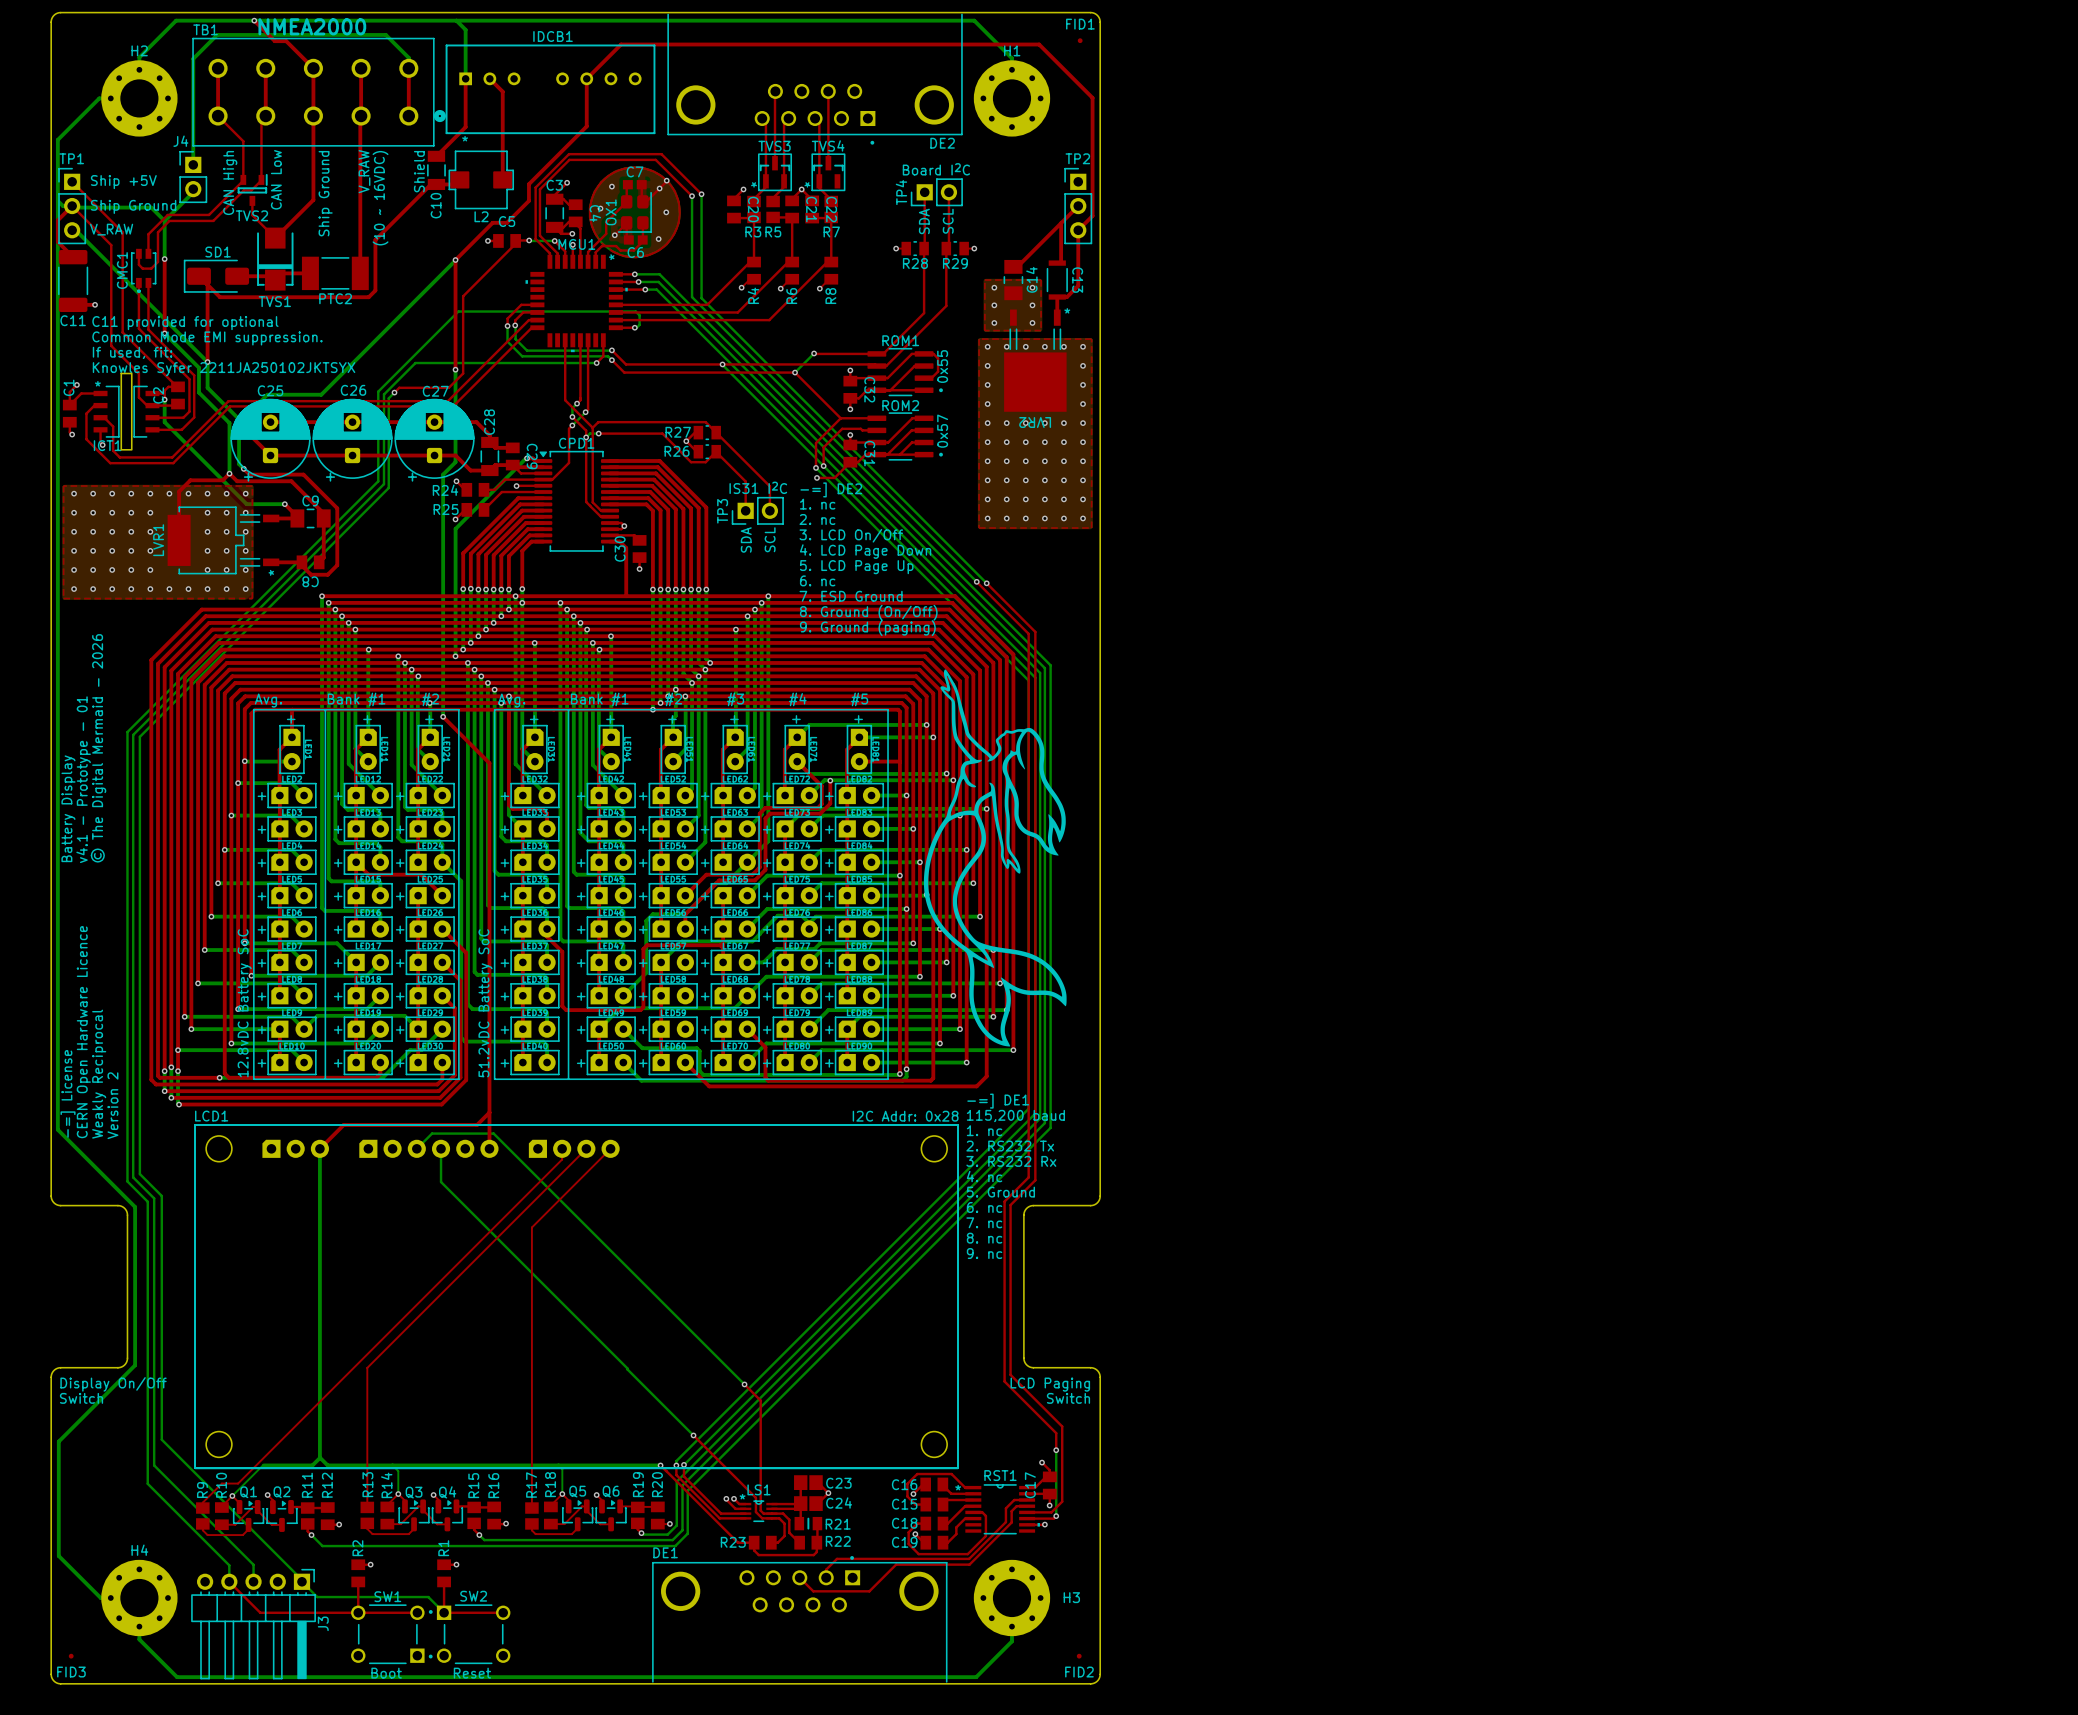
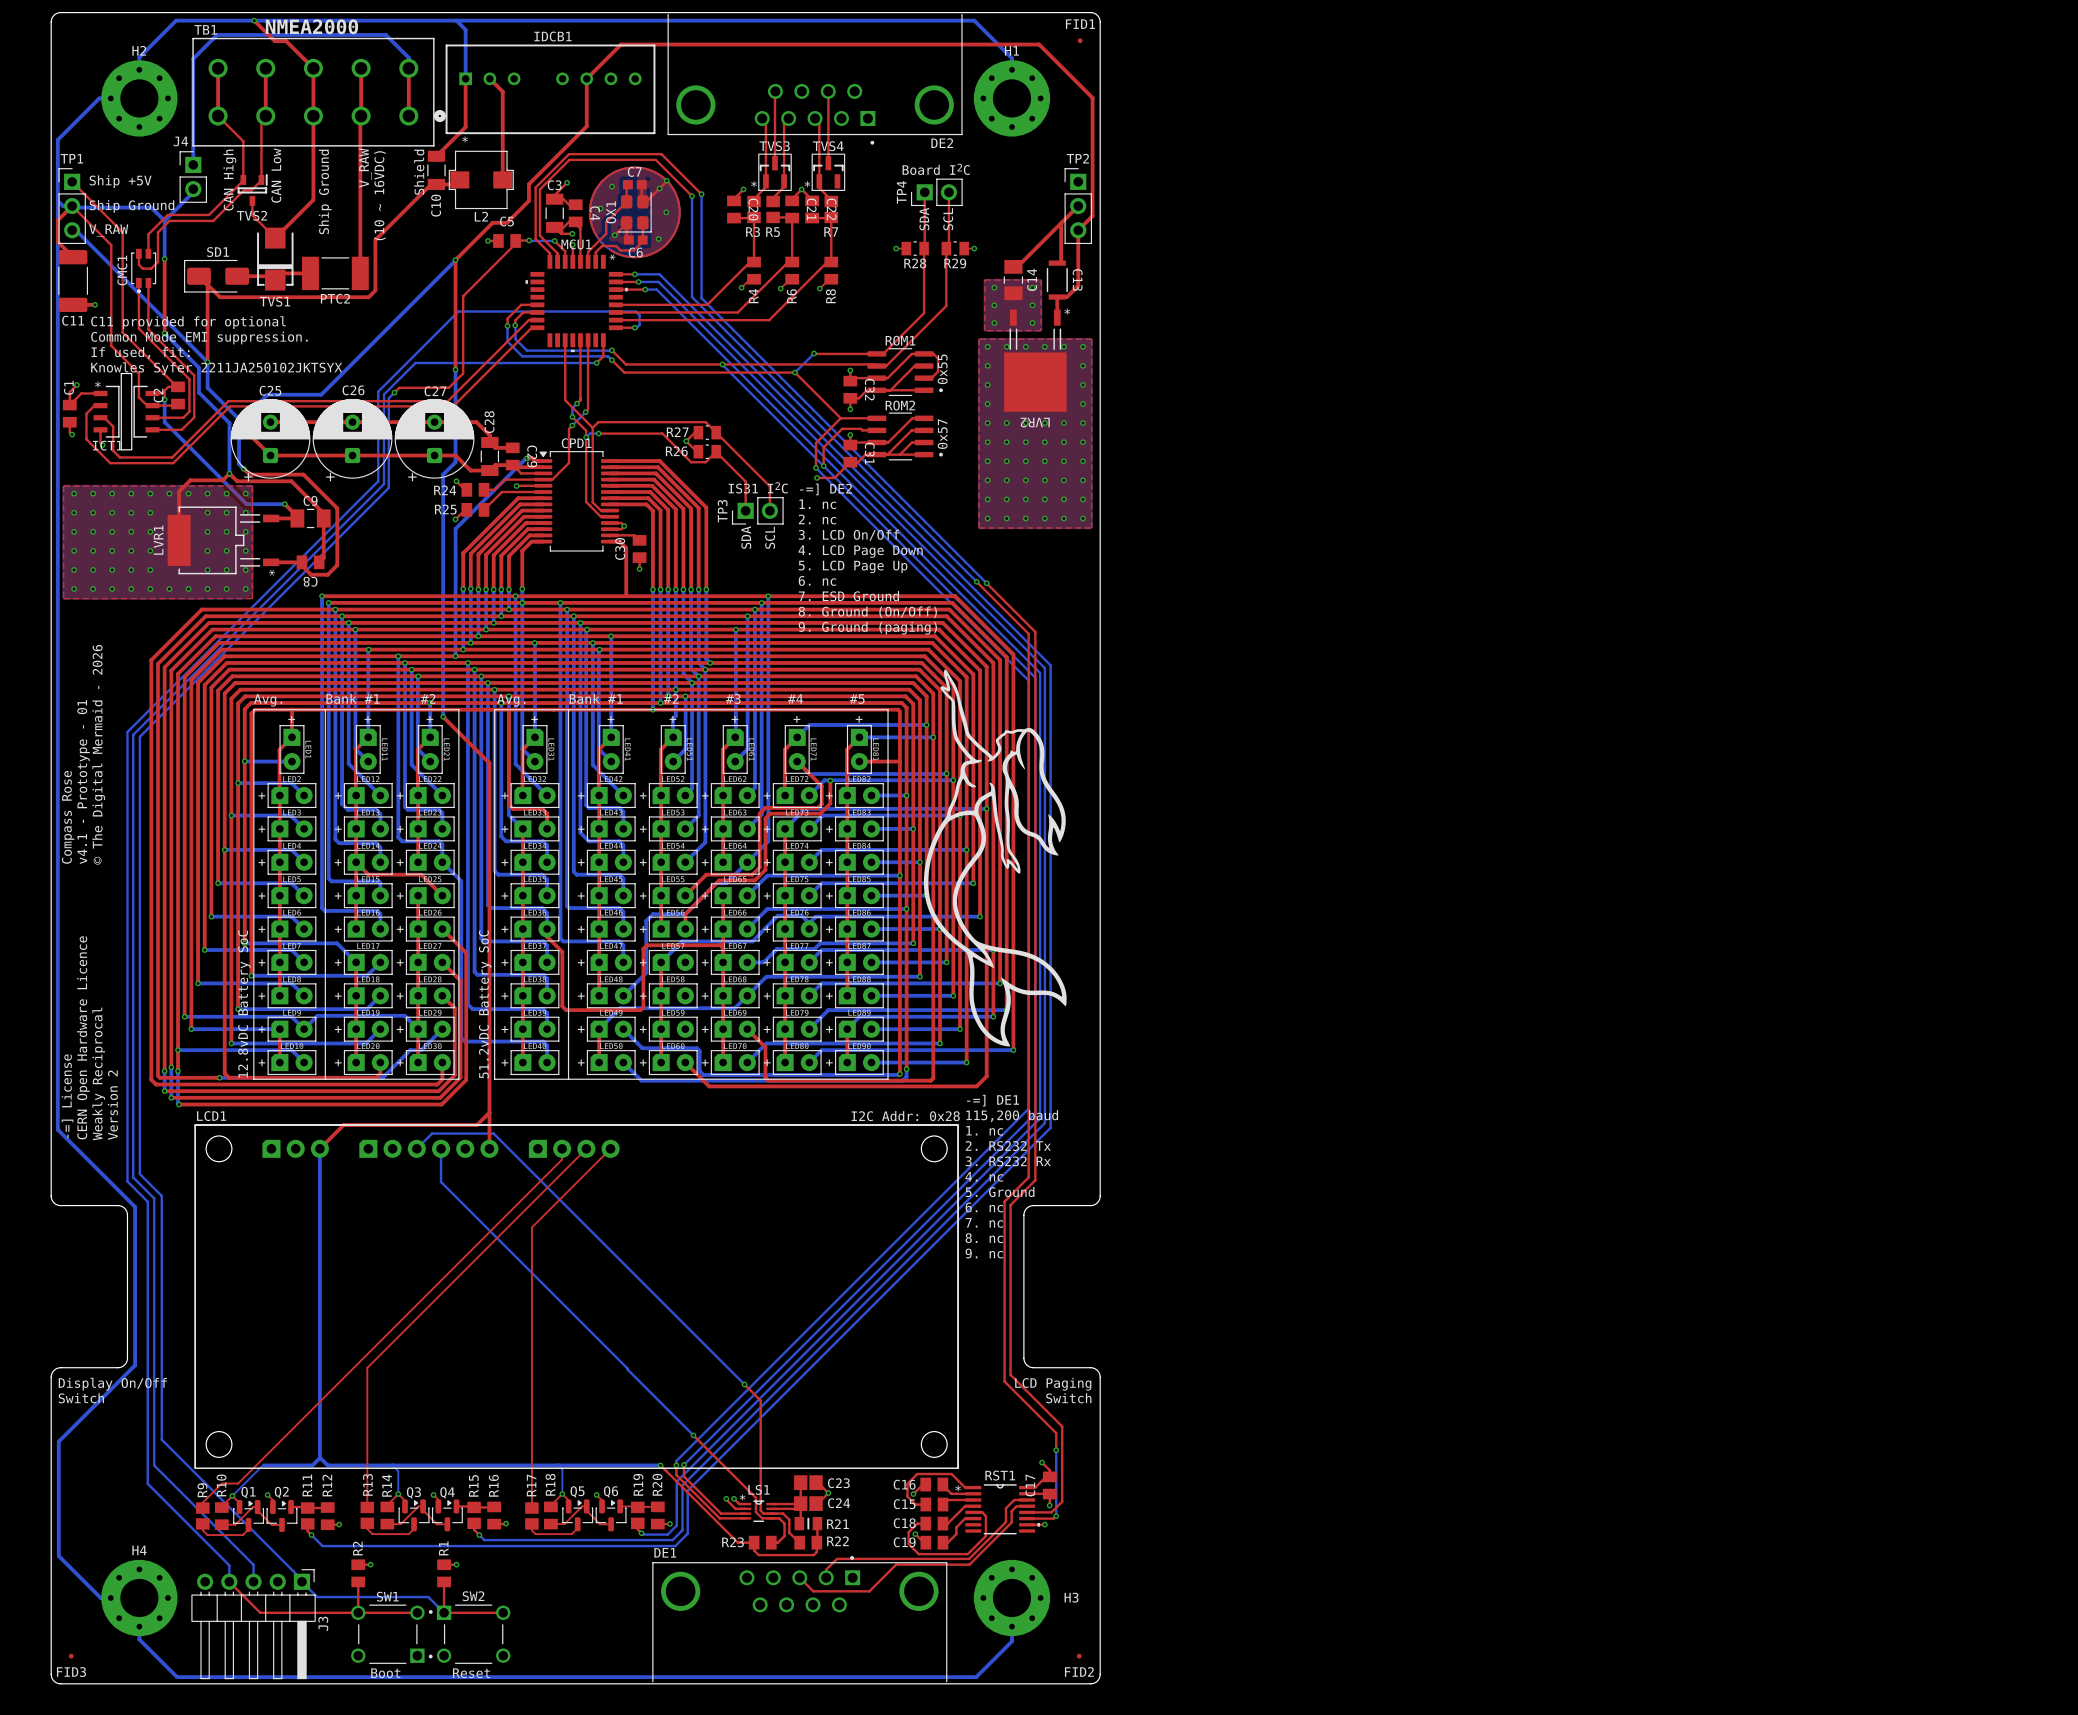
text: Battery Display (68, 808) -> Compass Rose (68, 817)

